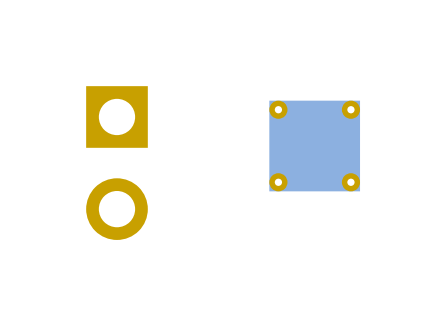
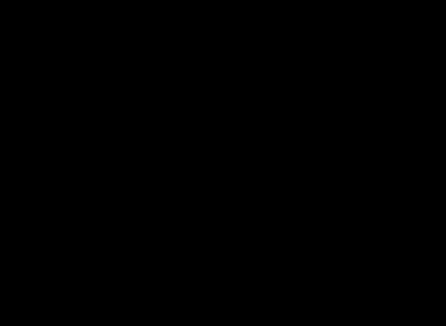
part: (314, 146) -> none
part: (116, 163) -> none

